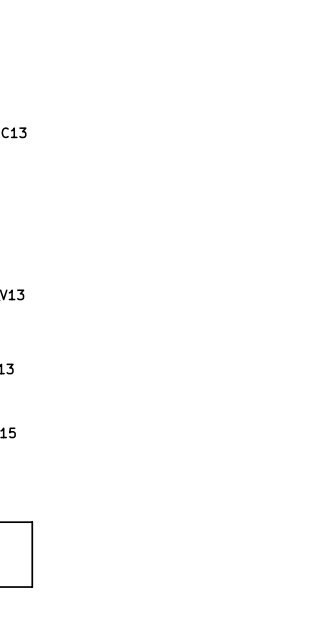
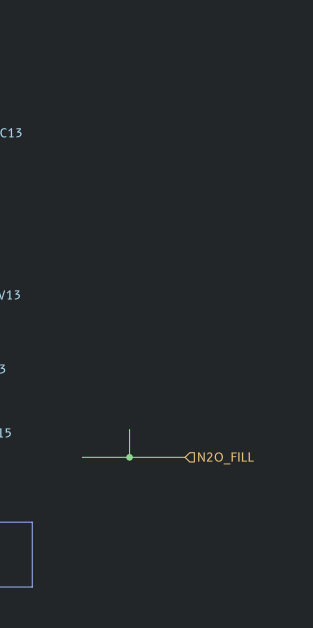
wire: none -> (129, 429) (129, 457)
wire: none -> (82, 457) (185, 457)
junction: none -> (129, 457)
hierarchical label: none -> N2O_FILL (225, 458)

